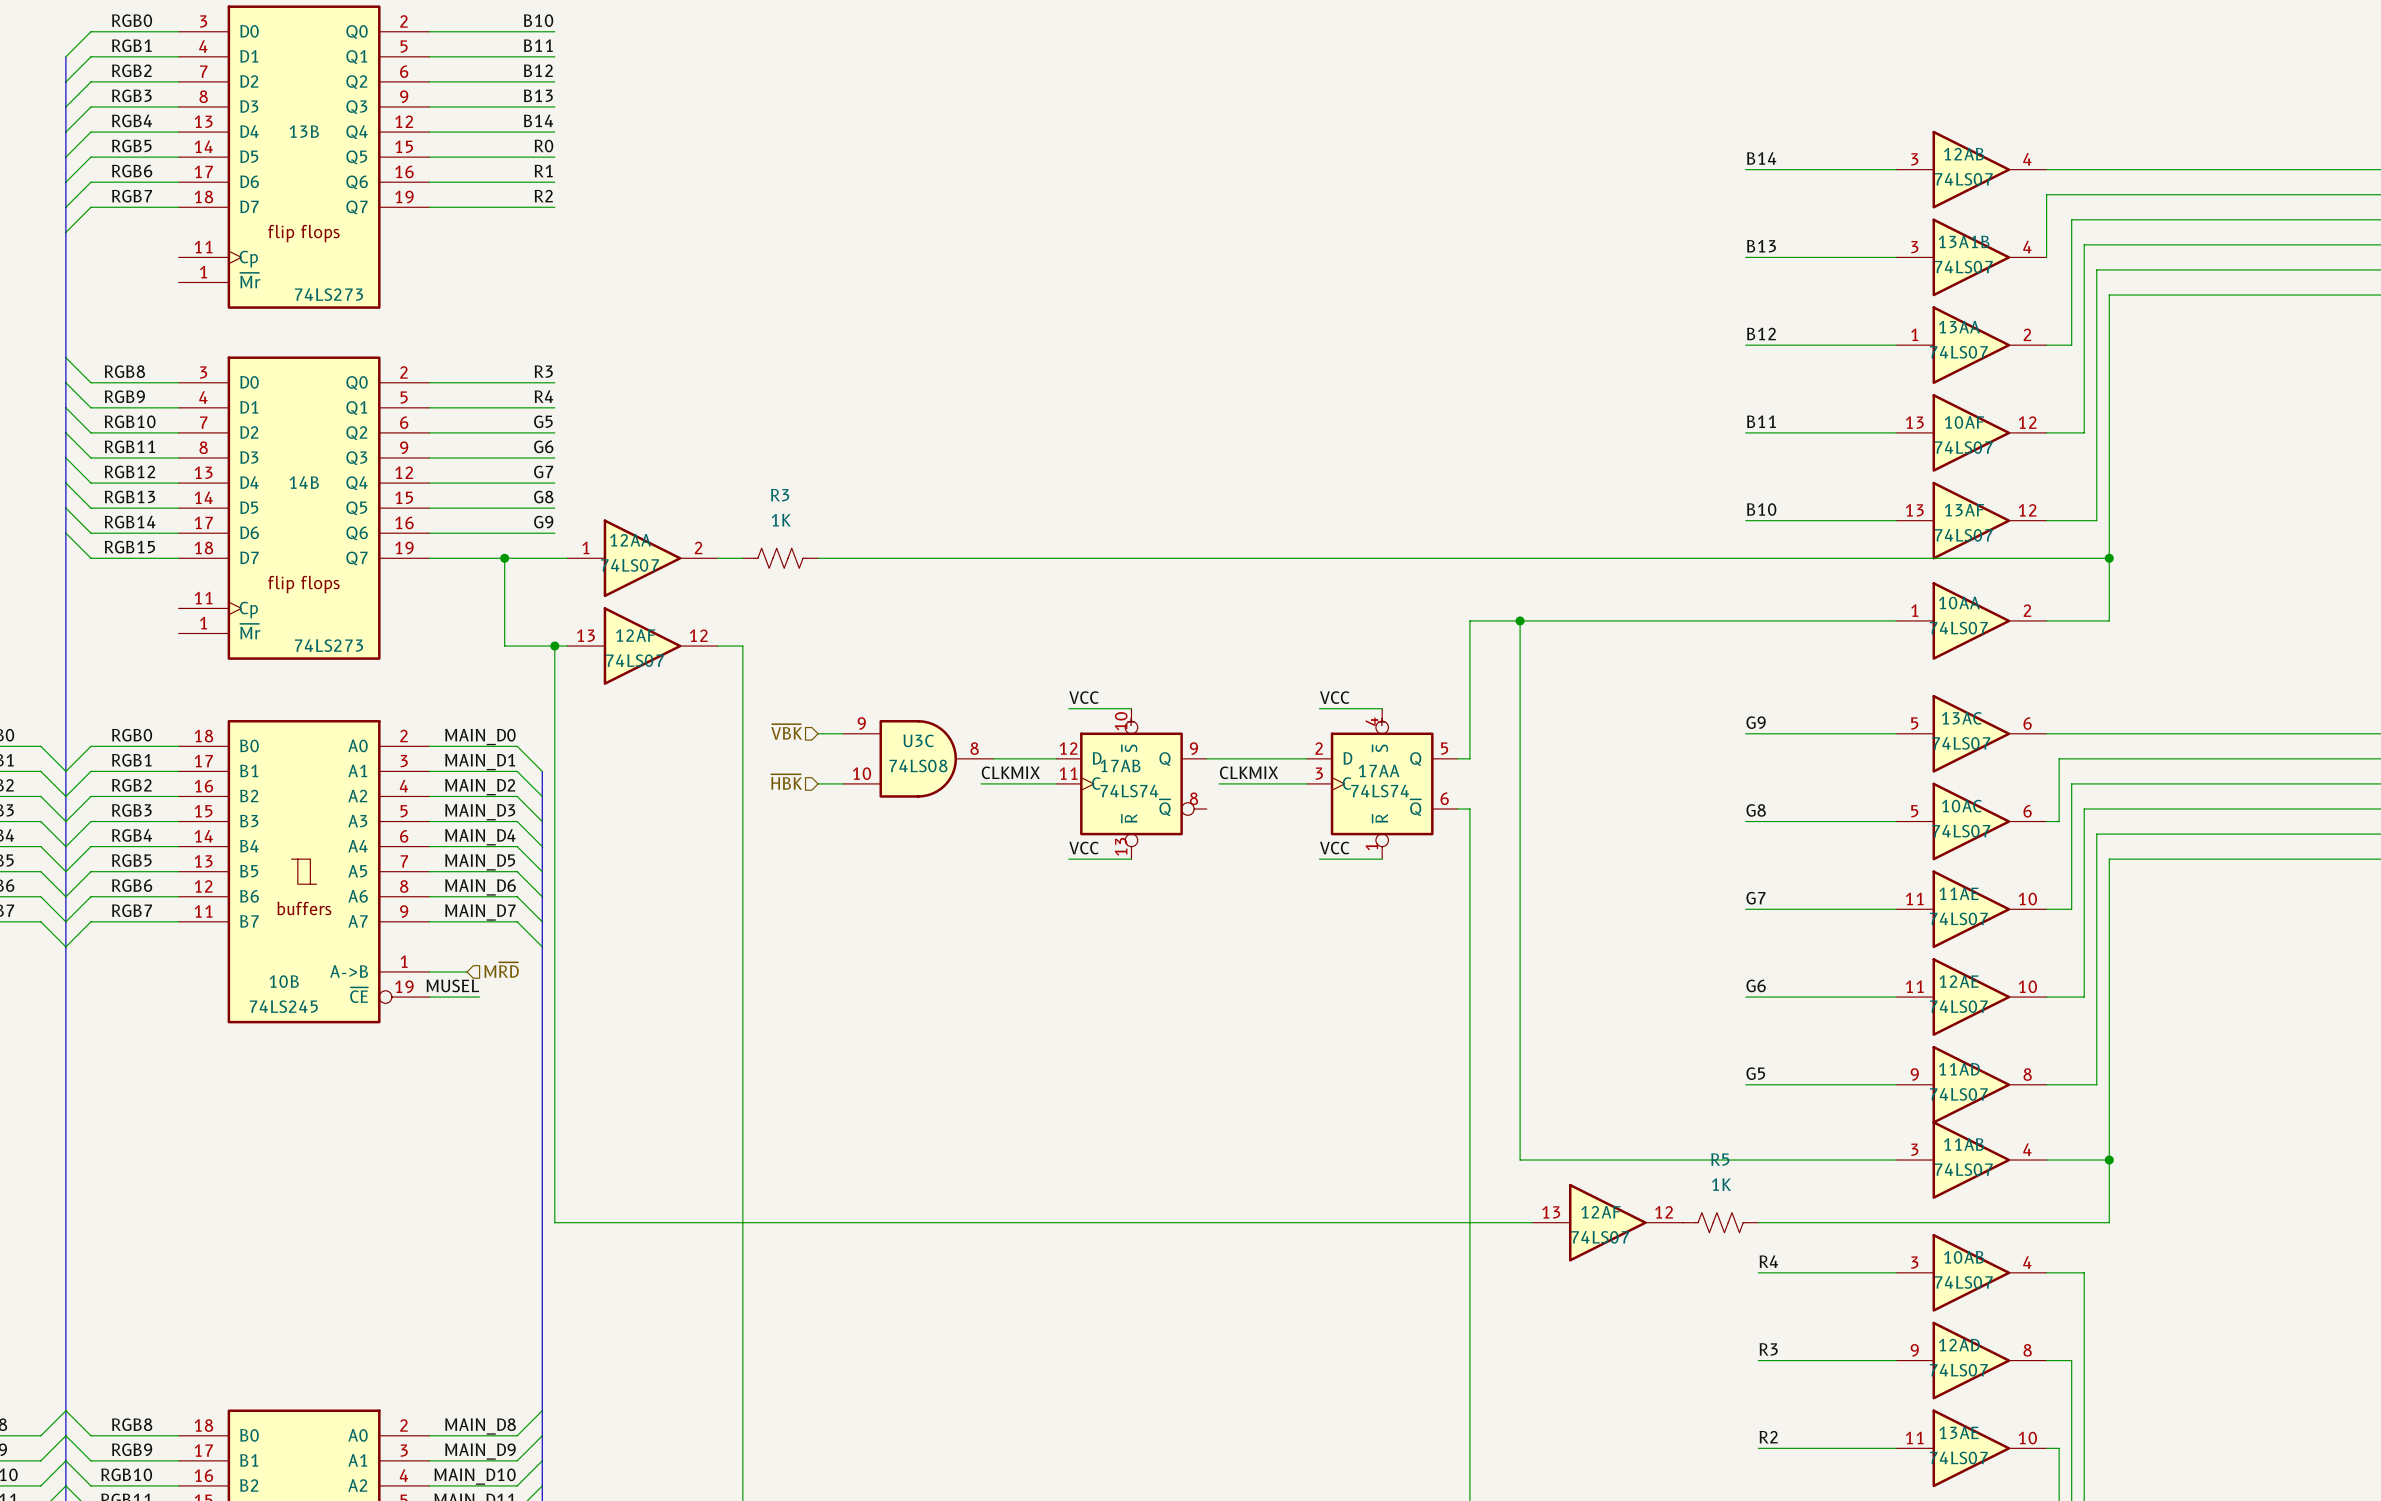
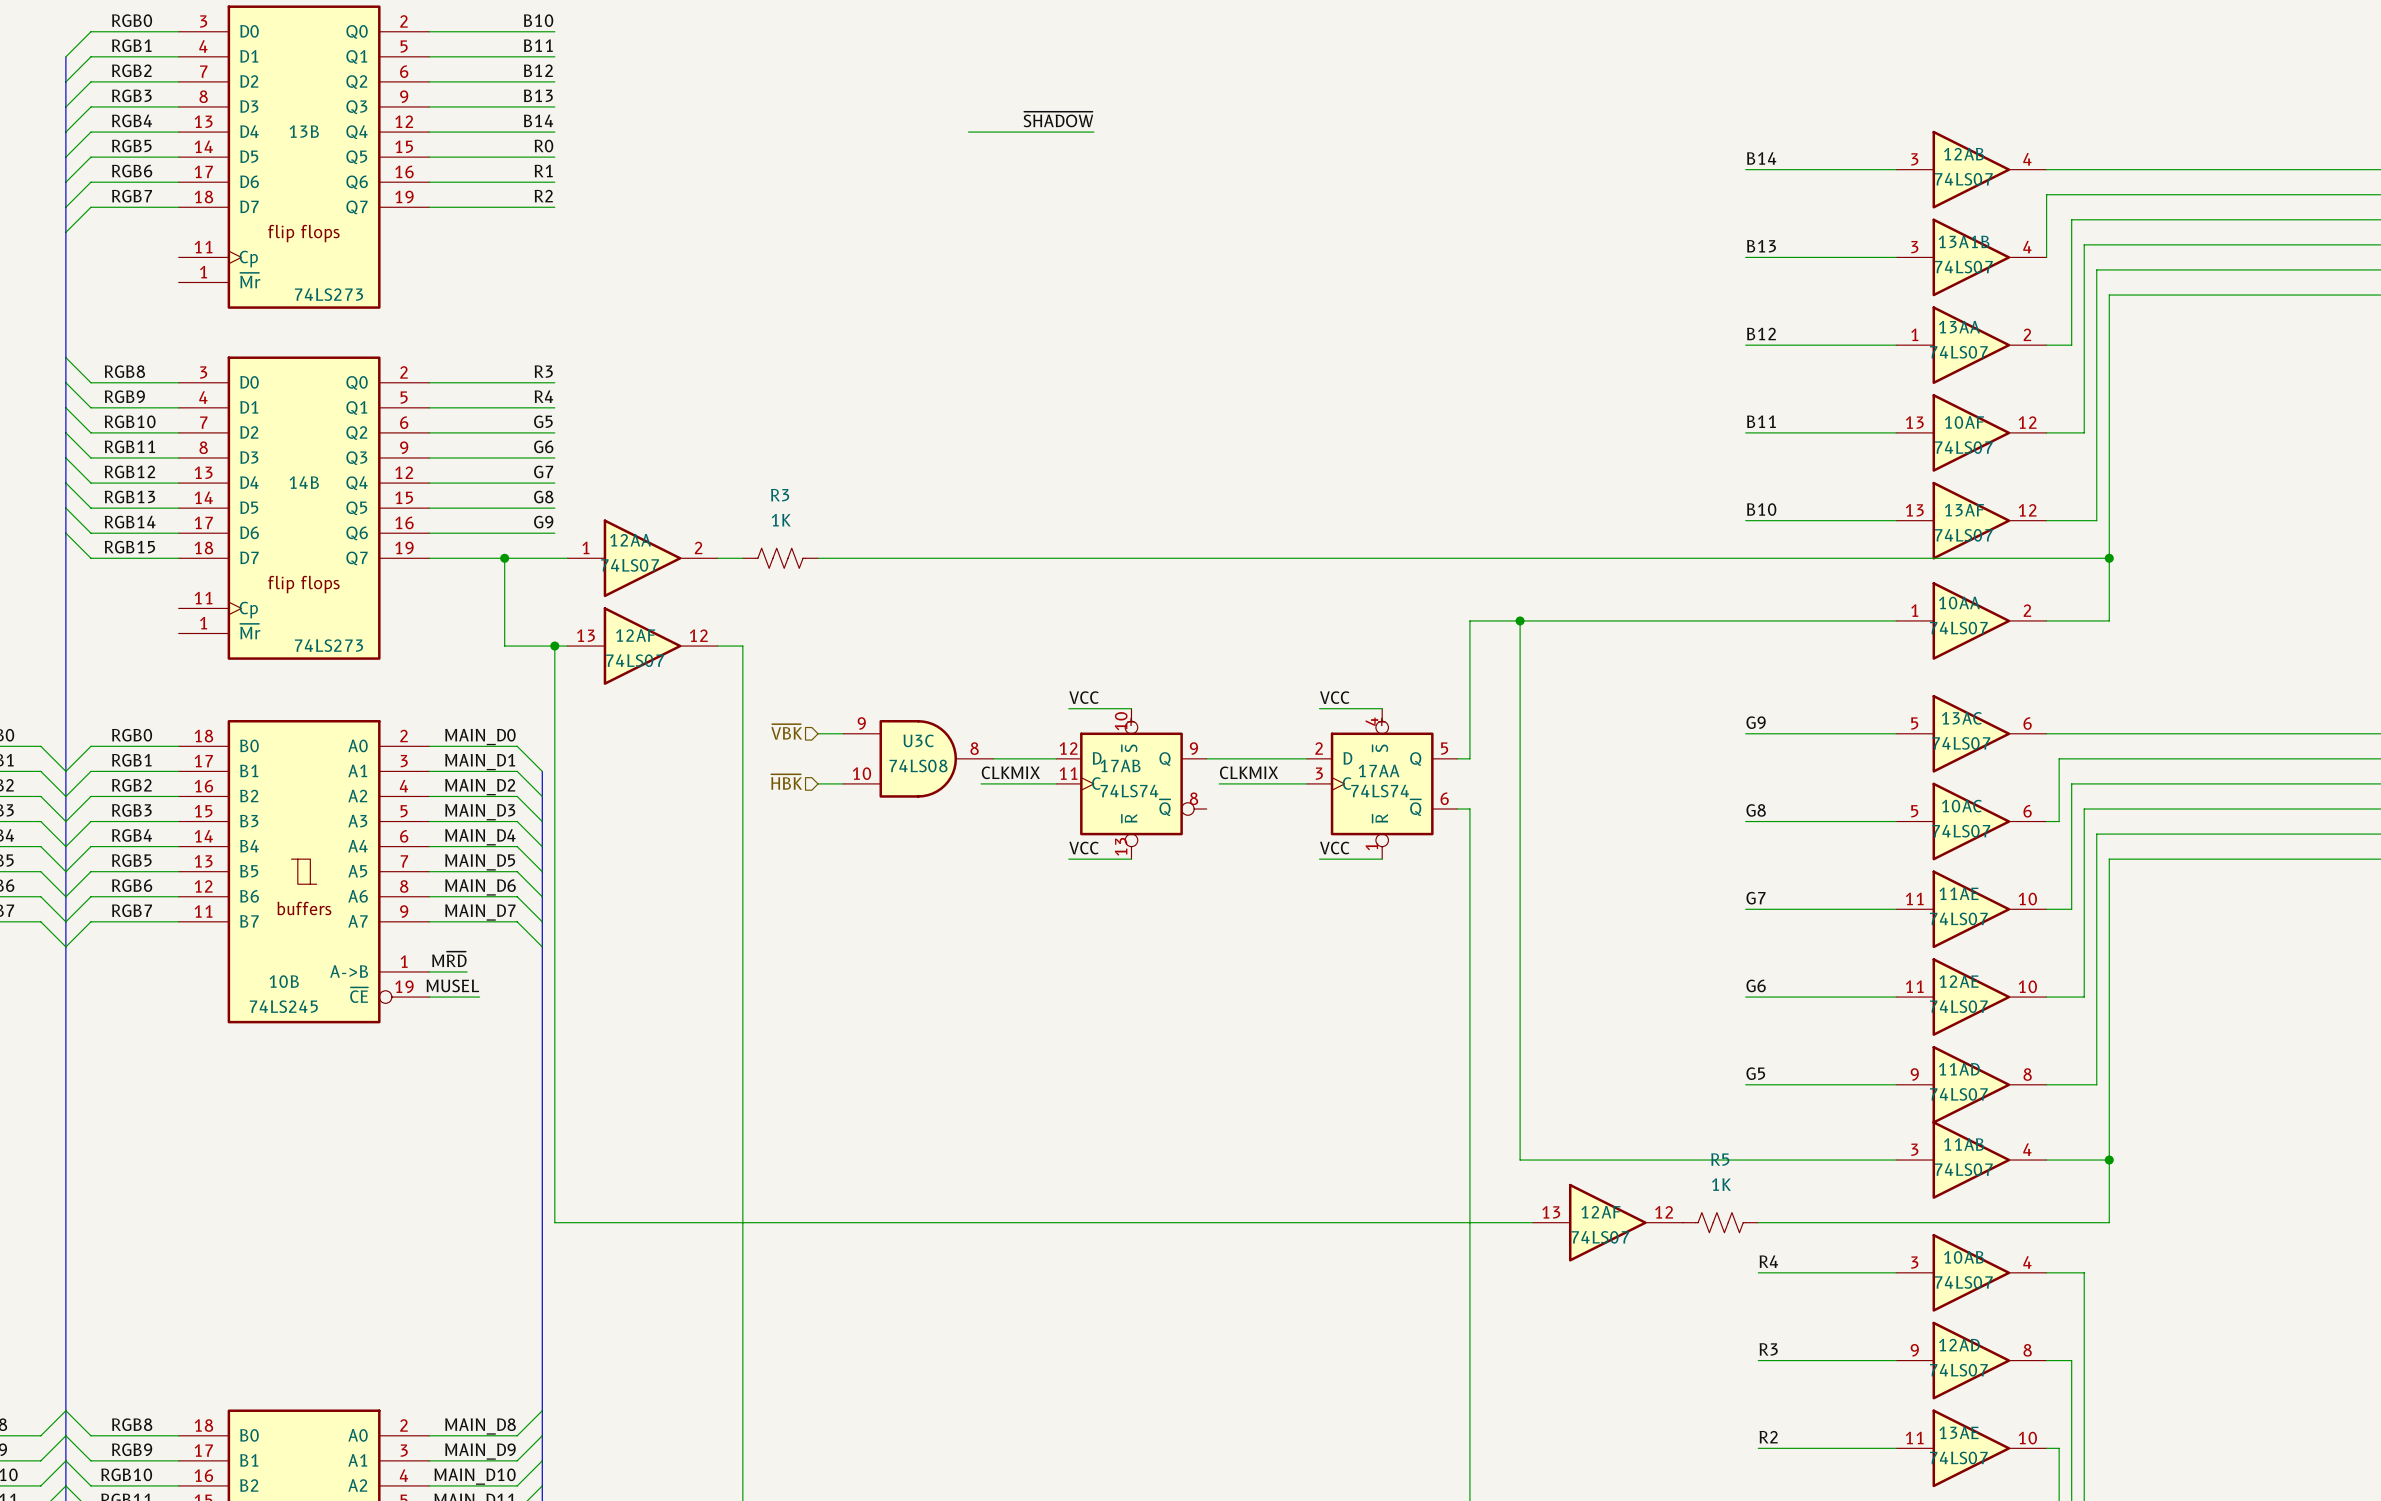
label: none -> ~{SHADOW} (1058, 119)
wire: none -> (968, 132) (1093, 132)
label: none -> M~{RD} (449, 959)
hierarchical label: M~{RD} (501, 970) -> none

